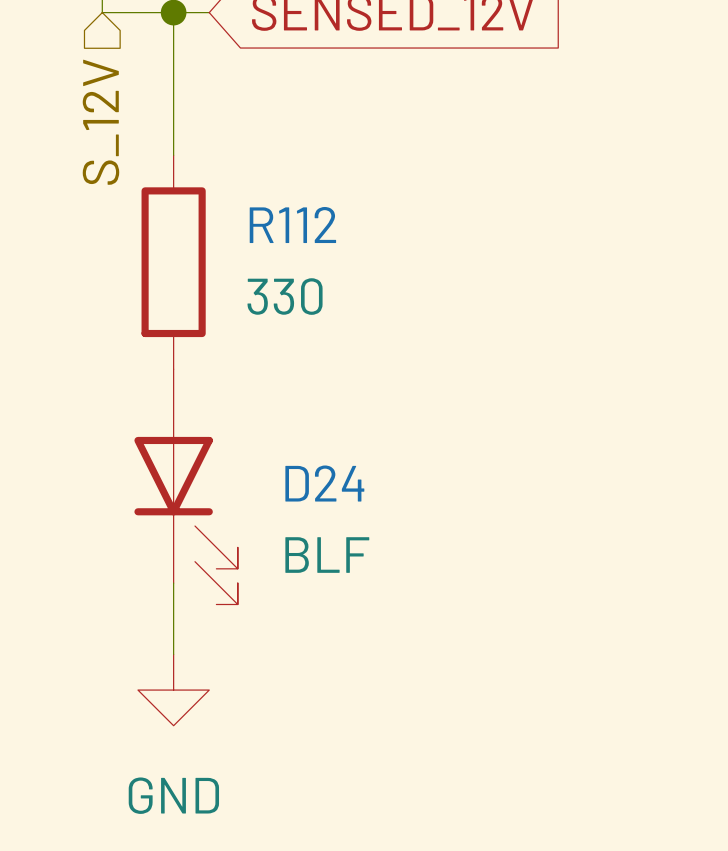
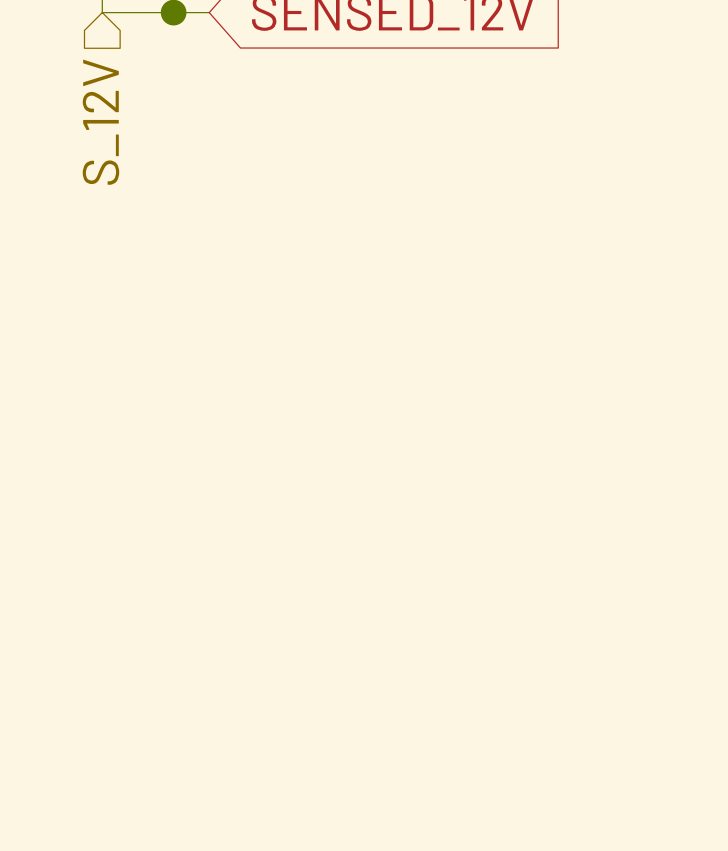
wire: (173, 12) (173, 155) -> none
R112: 330 (173, 262) -> none
D24: BLF (186, 486) -> none
wire: (173, 583) (173, 654) -> none
power symbol: GND (173, 690) -> none

